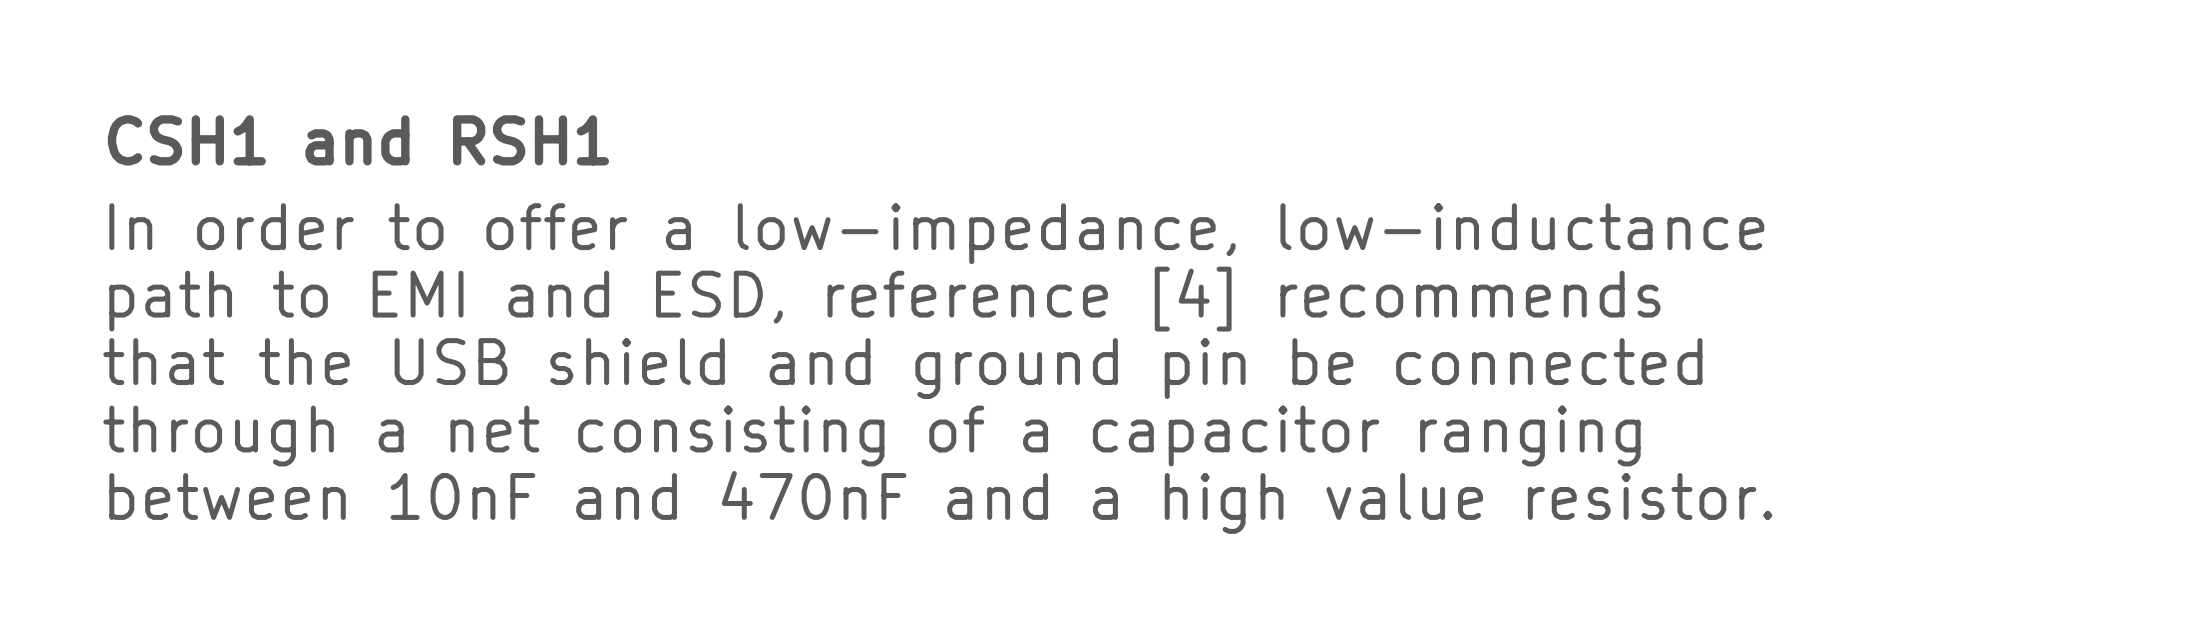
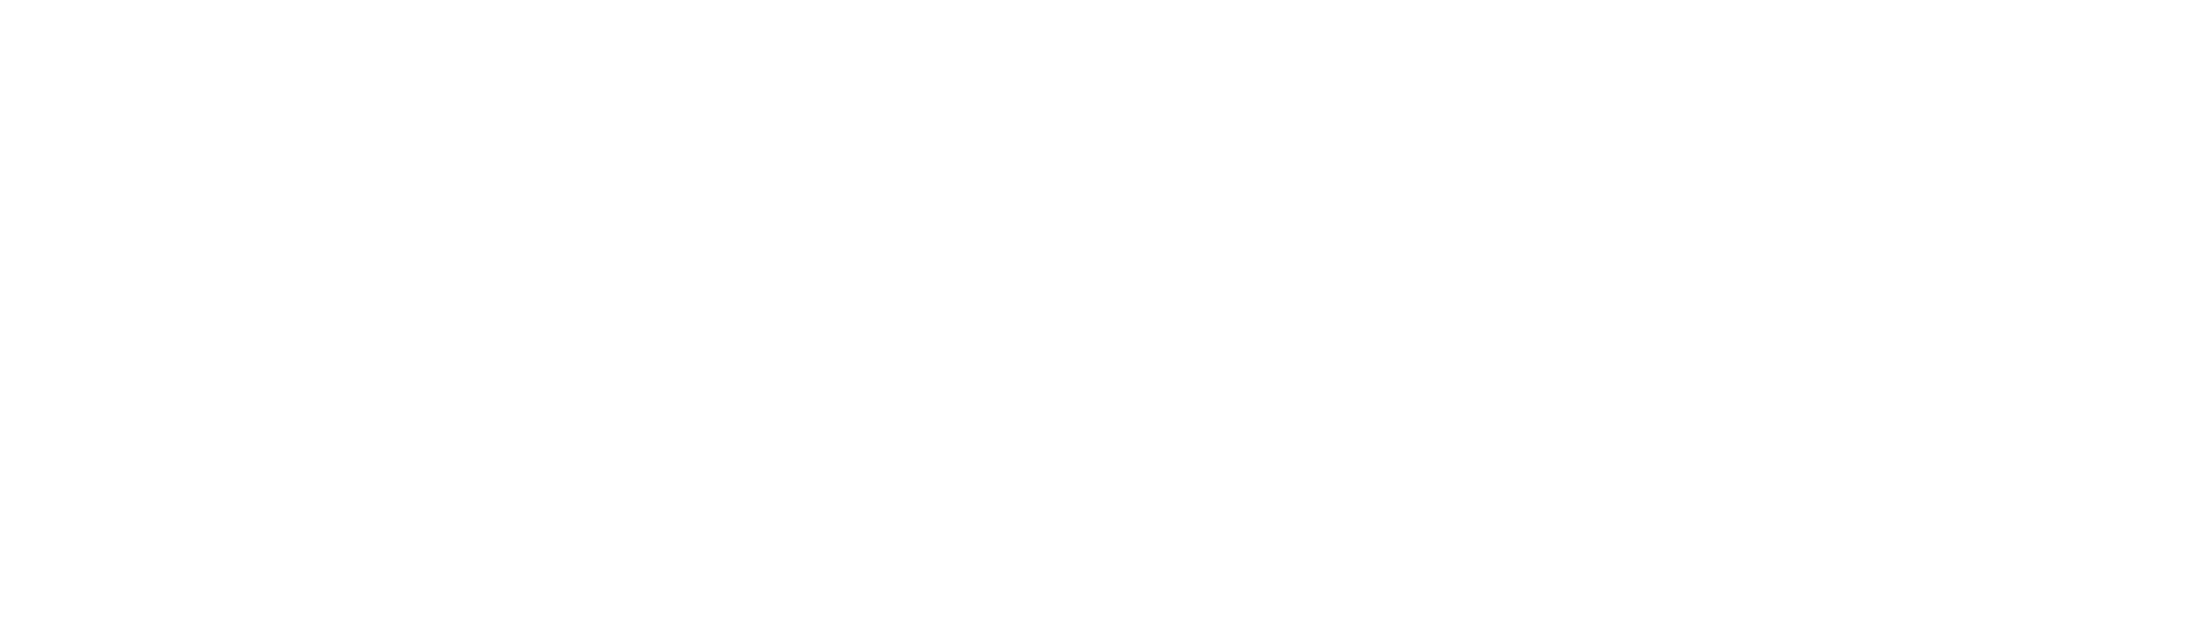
text: CSH1 and RSH1 (358, 140) -> none
text: In order to offer a low-impedance, low-inductance (936, 233) -> none
text: path to EMI and ESD, reference [4] recommends (884, 299) -> none
text: that the USB shield and ground pin be connected (902, 368) -> none
text: through a net consisting of a capacitor ranging (871, 436) -> none
text: between 10nF and 470nF and a high value resistor. (940, 502) -> none

